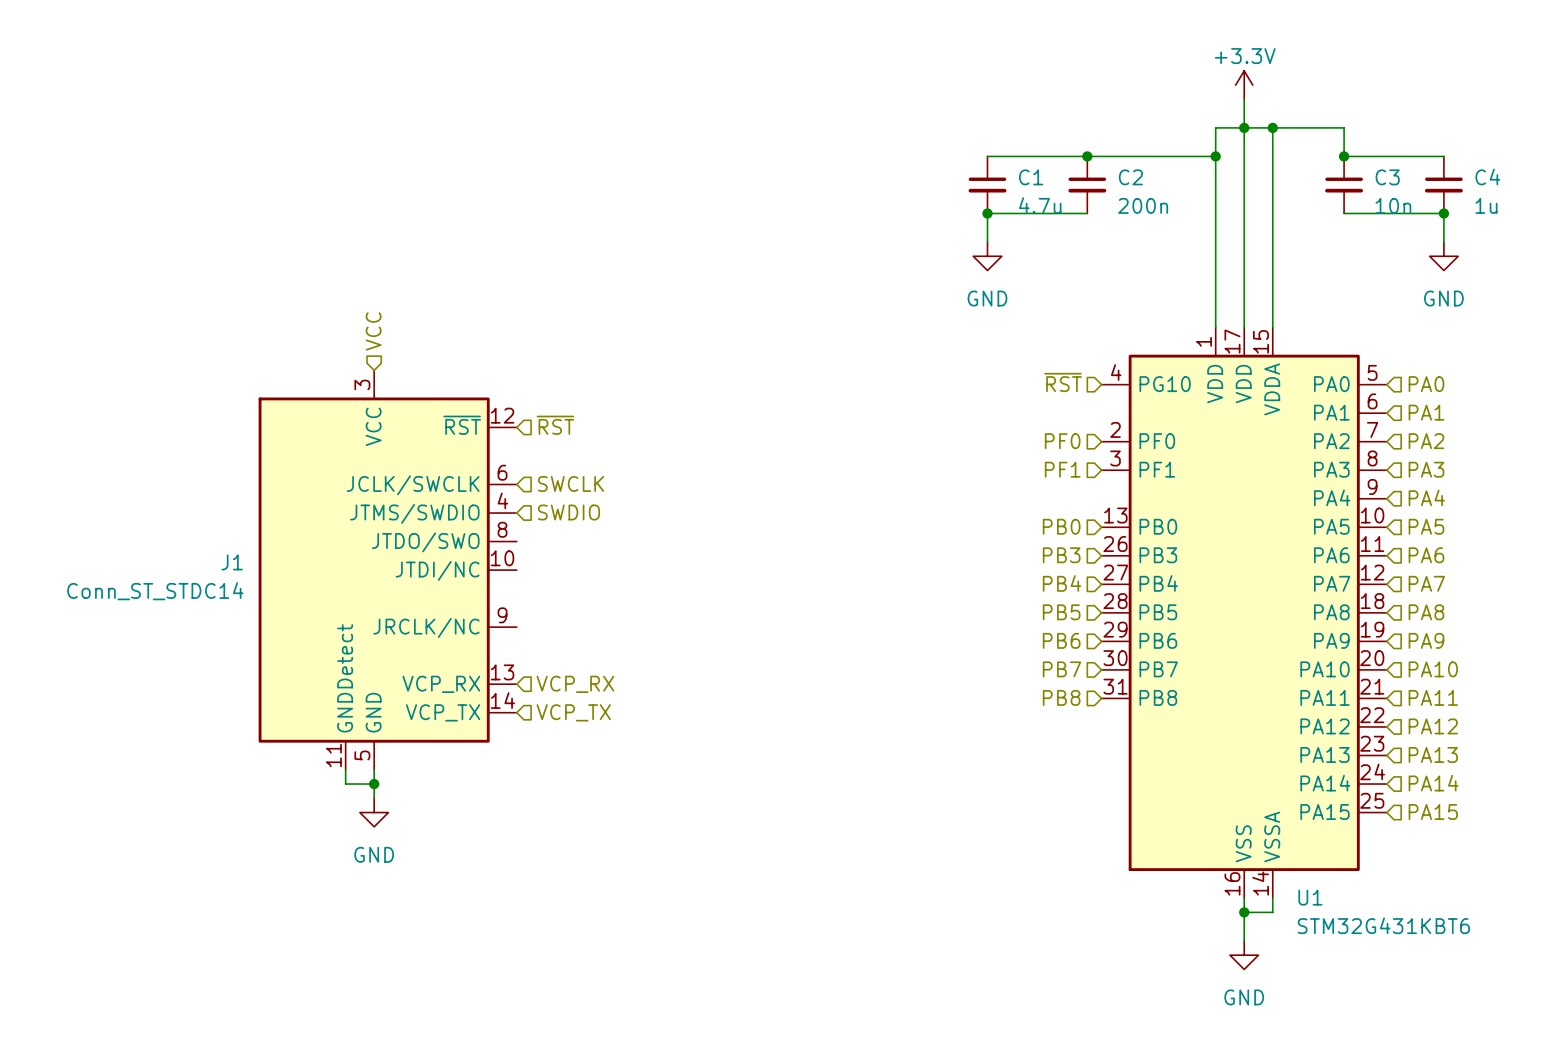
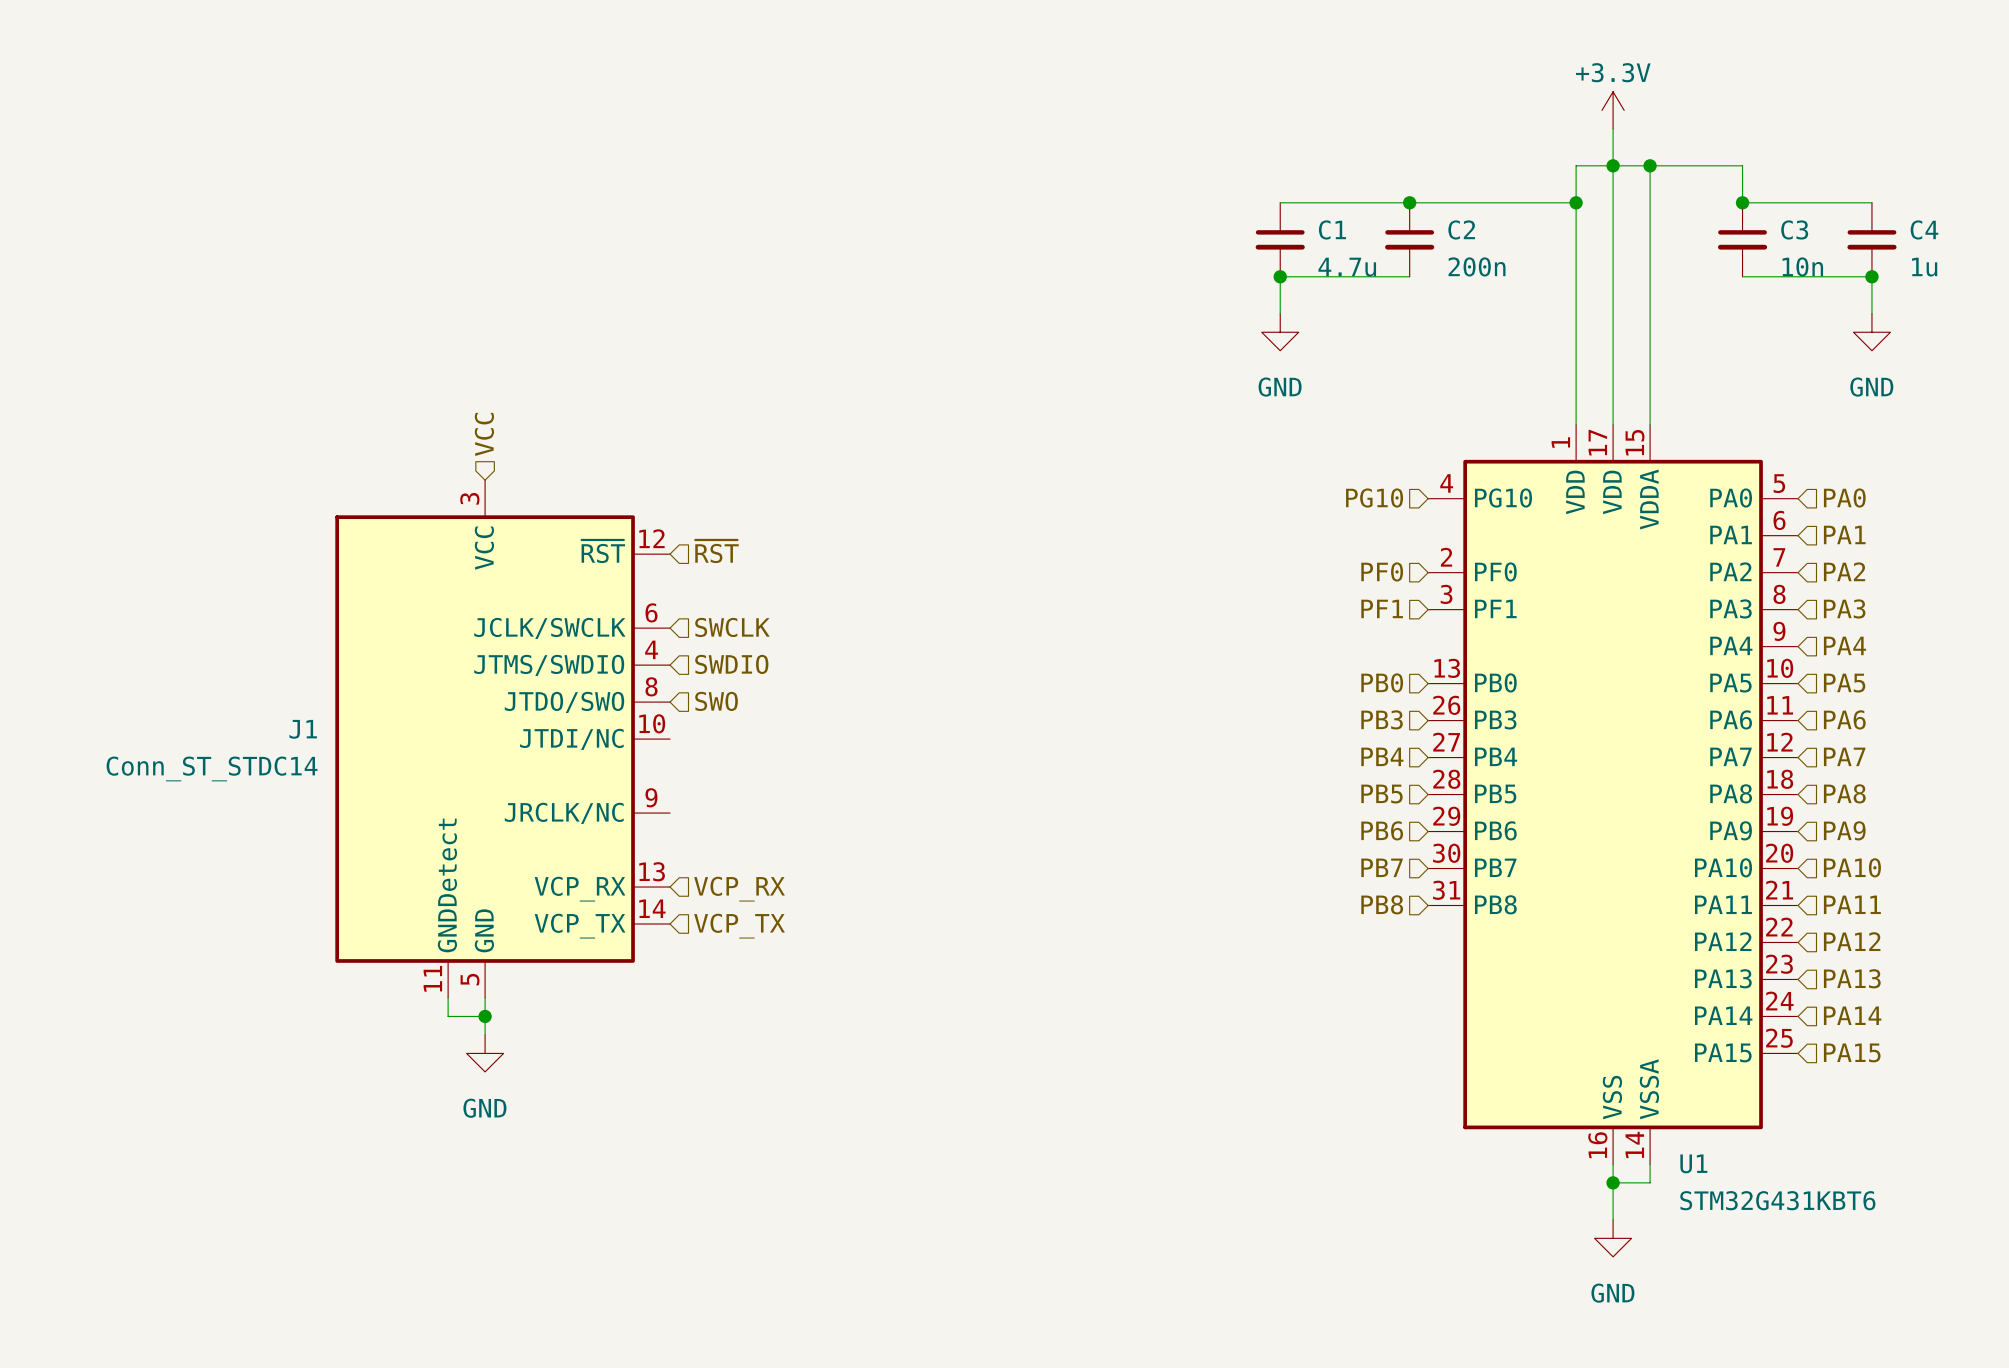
hierarchical label: ~{RST} (1063, 382) -> PG10 (1374, 498)
hierarchical label: none -> SWO (716, 701)

